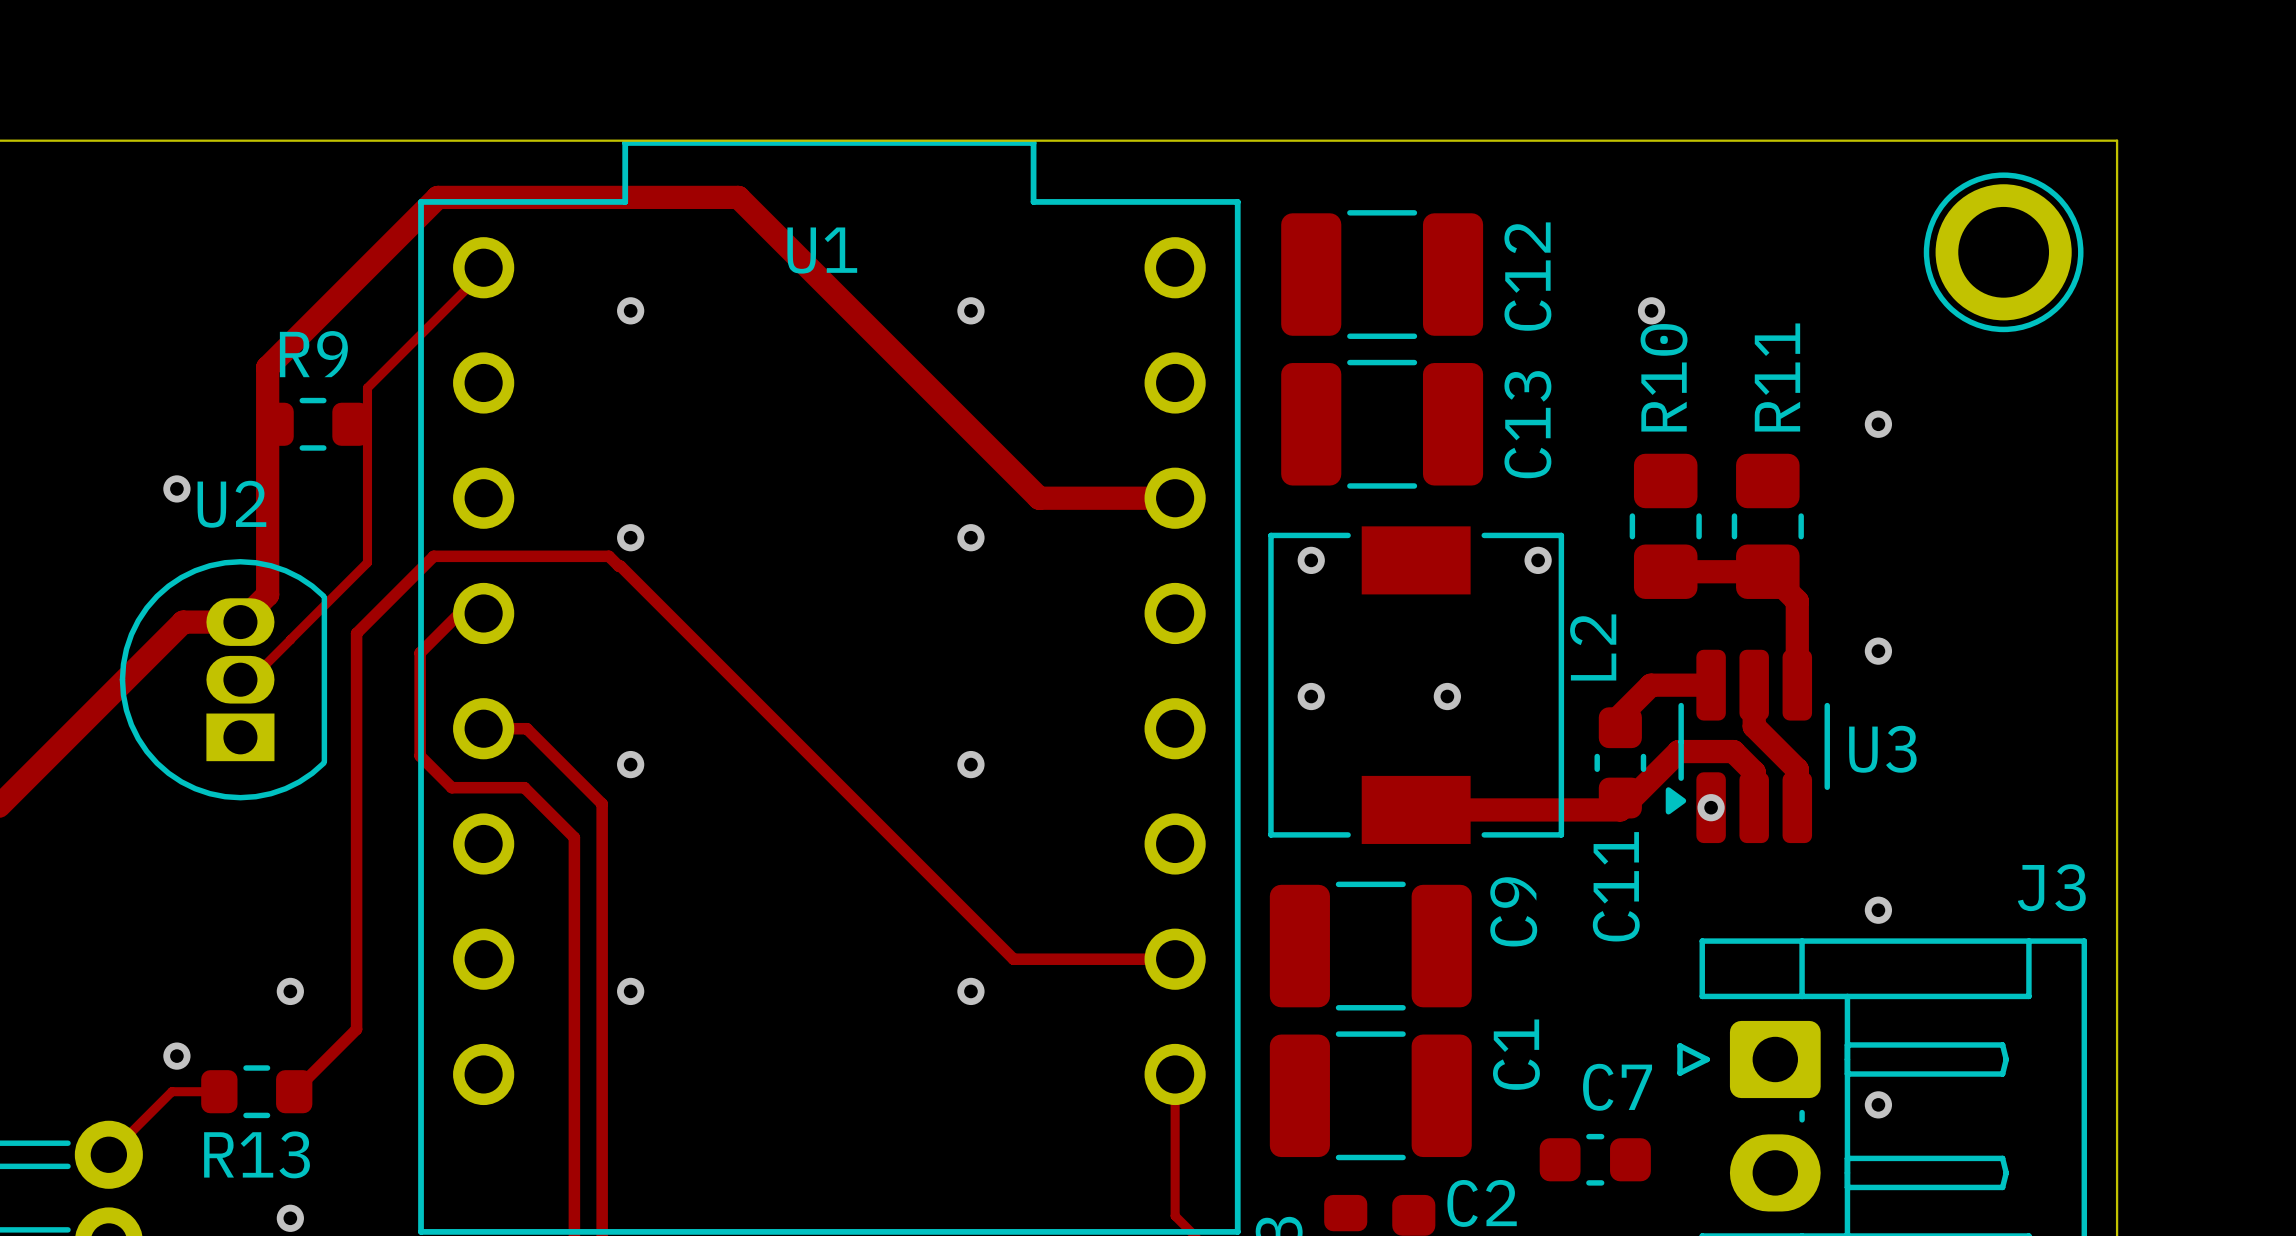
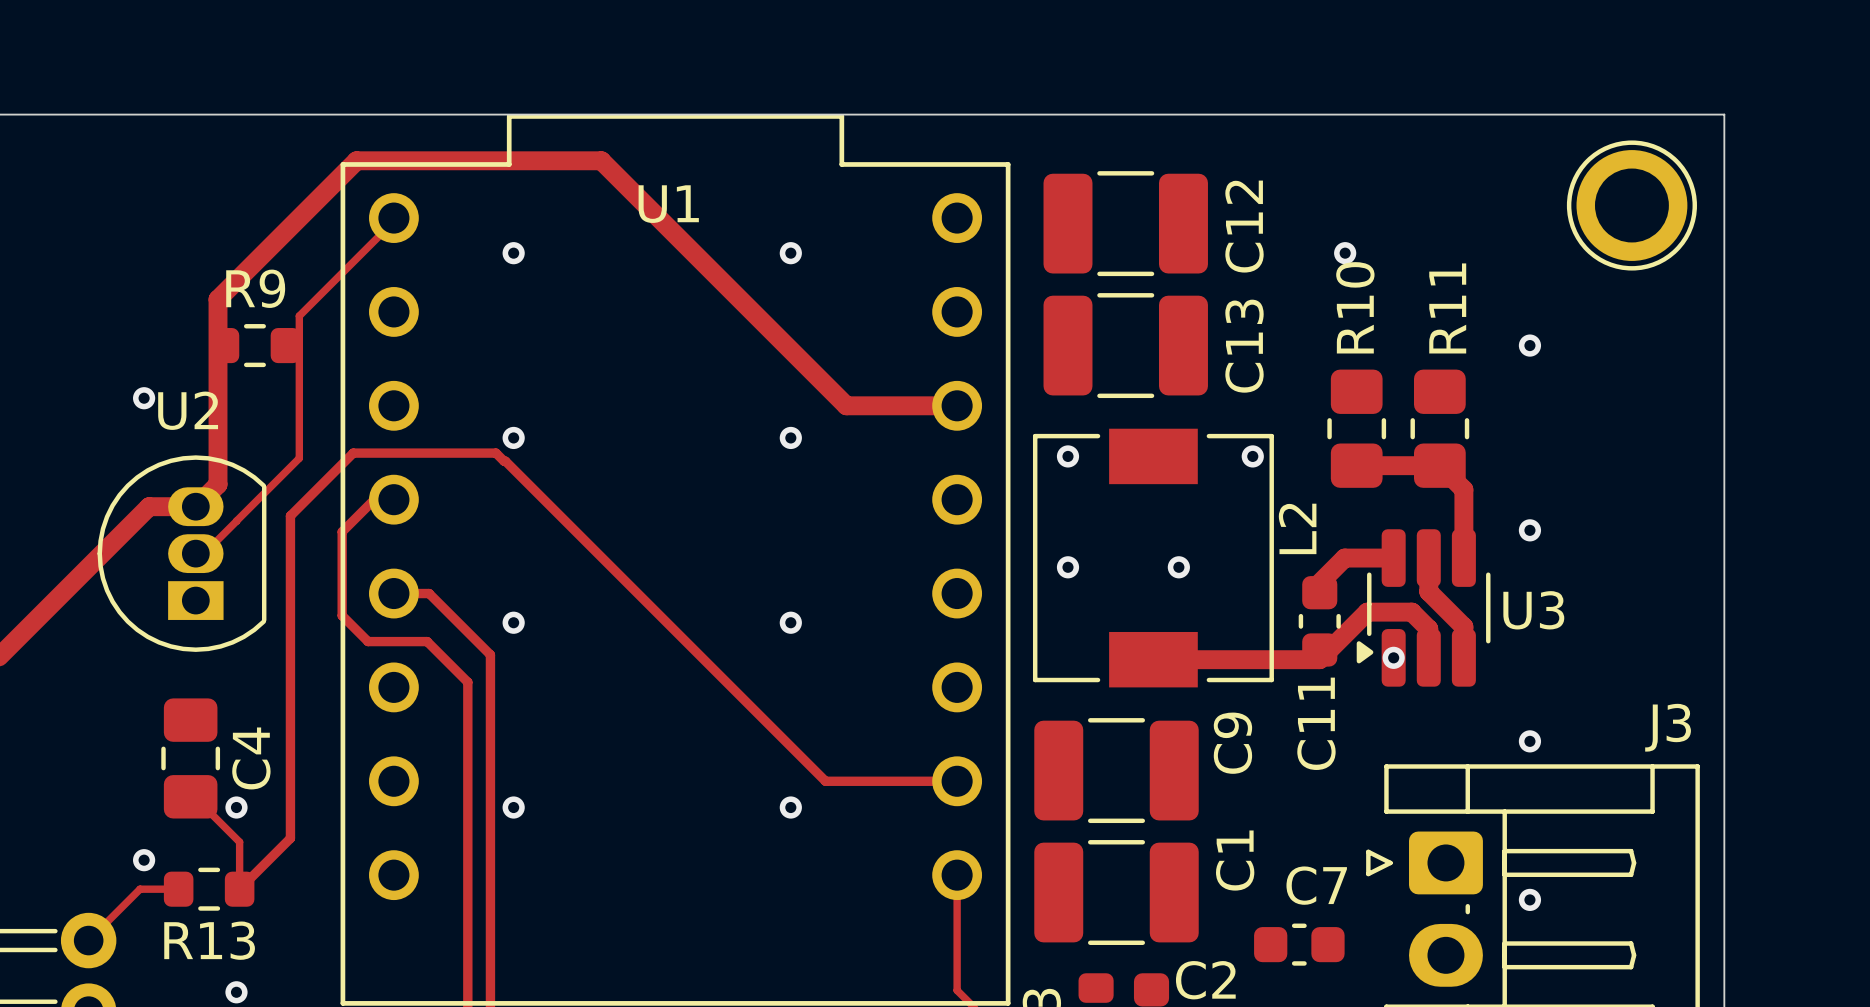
C4: none -> (190, 758)
track: none -> (209, 796) (209, 811) (239, 842) (239, 889)

